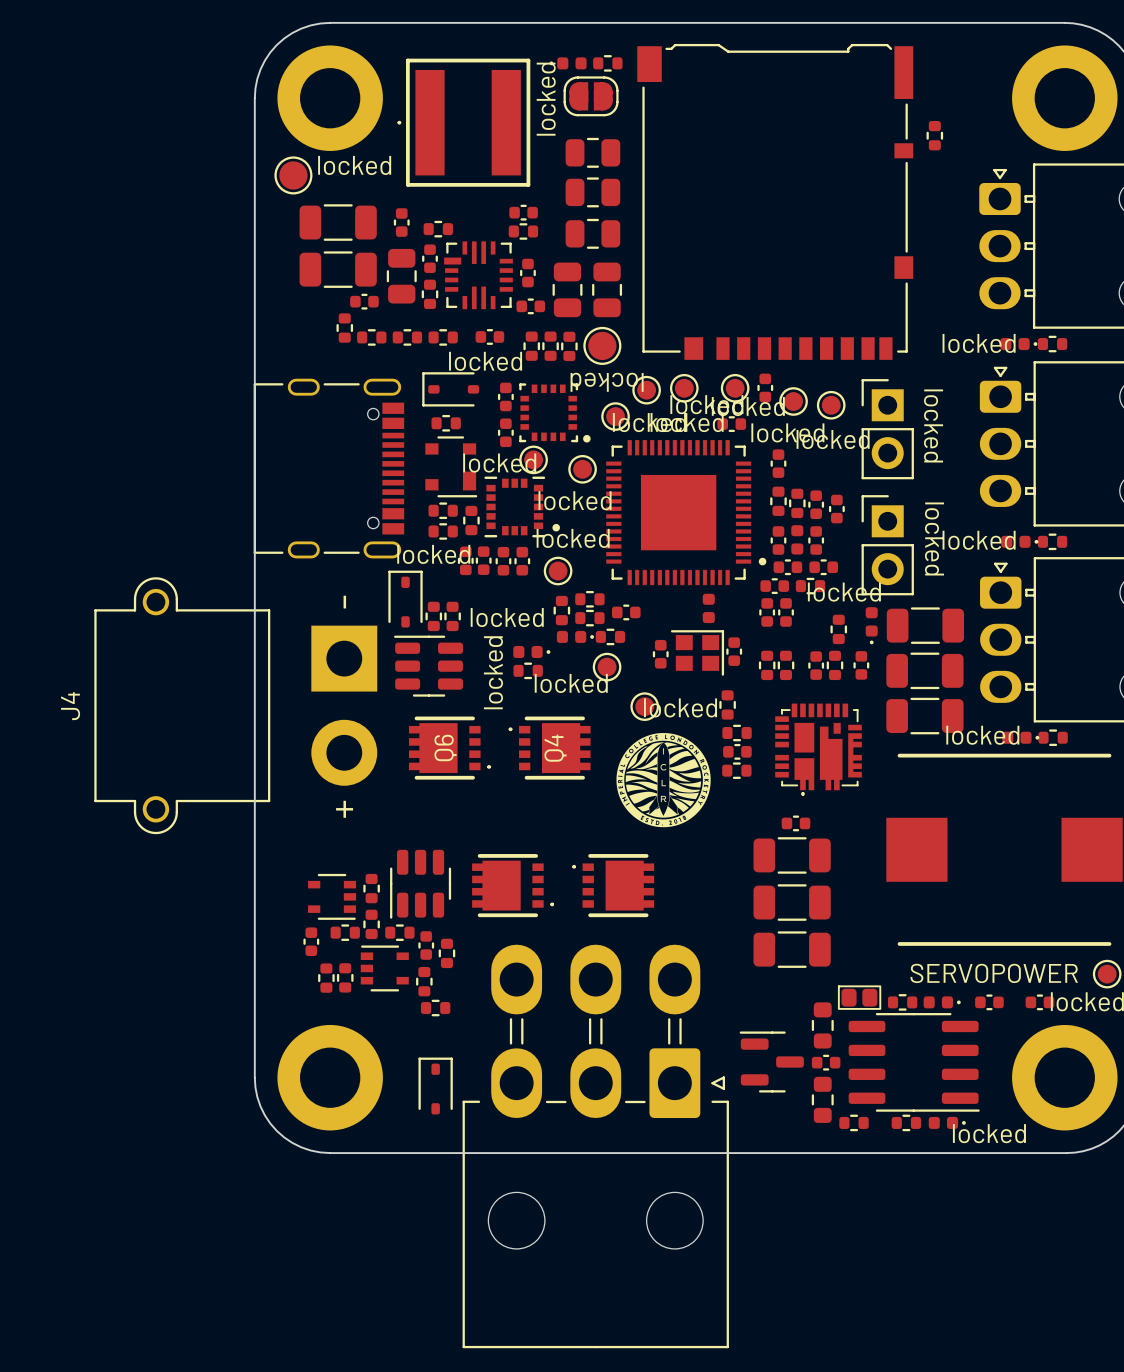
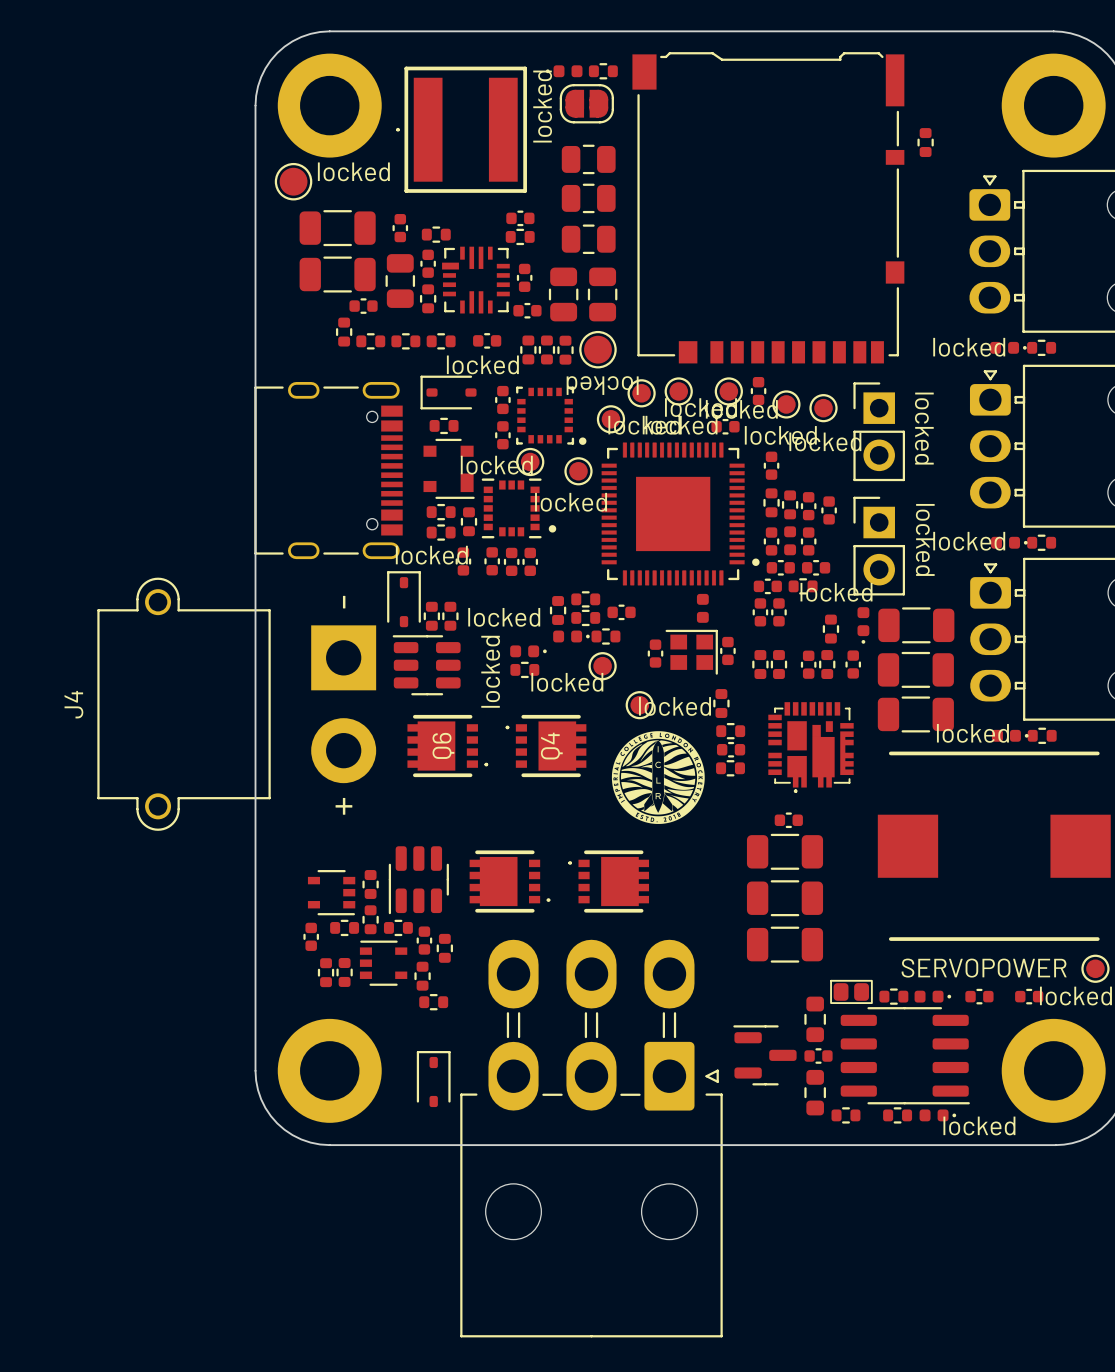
part: (483, 560) -> none
part: none -> (492, 561)
part: (503, 561) -> none
part: none -> (511, 561)
part: (522, 561) -> none
part: none -> (530, 561)
locked: (558, 571) -> none

